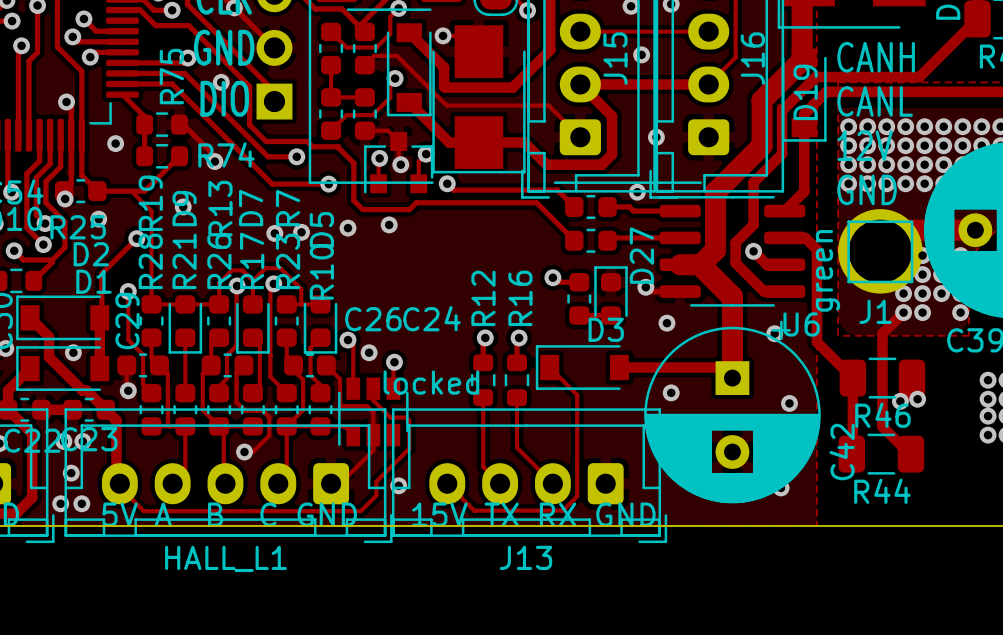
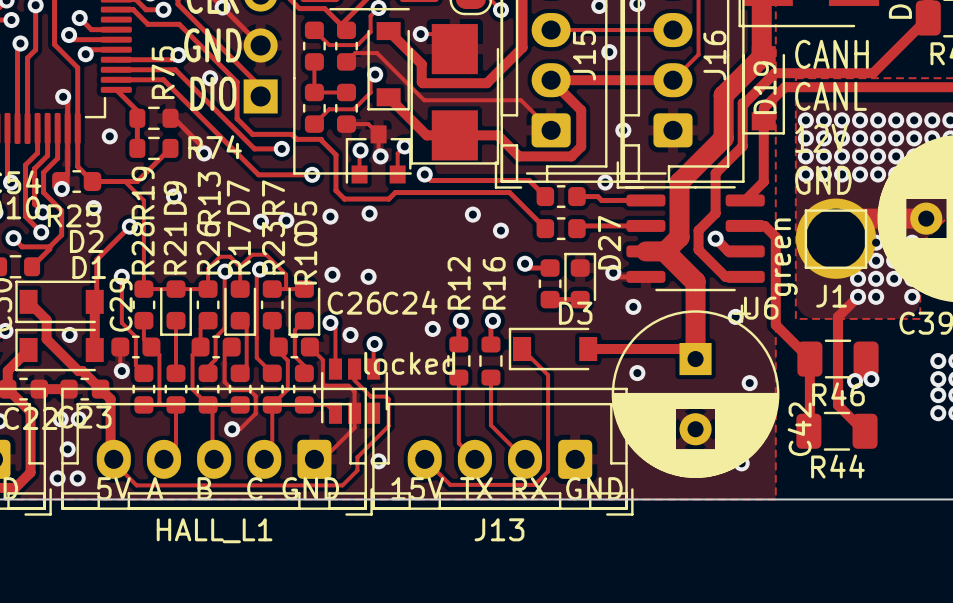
via: none -> (472, 214)
via: none -> (500, 230)
via: none -> (332, 274)
via: none -> (368, 276)
via: none -> (432, 328)

